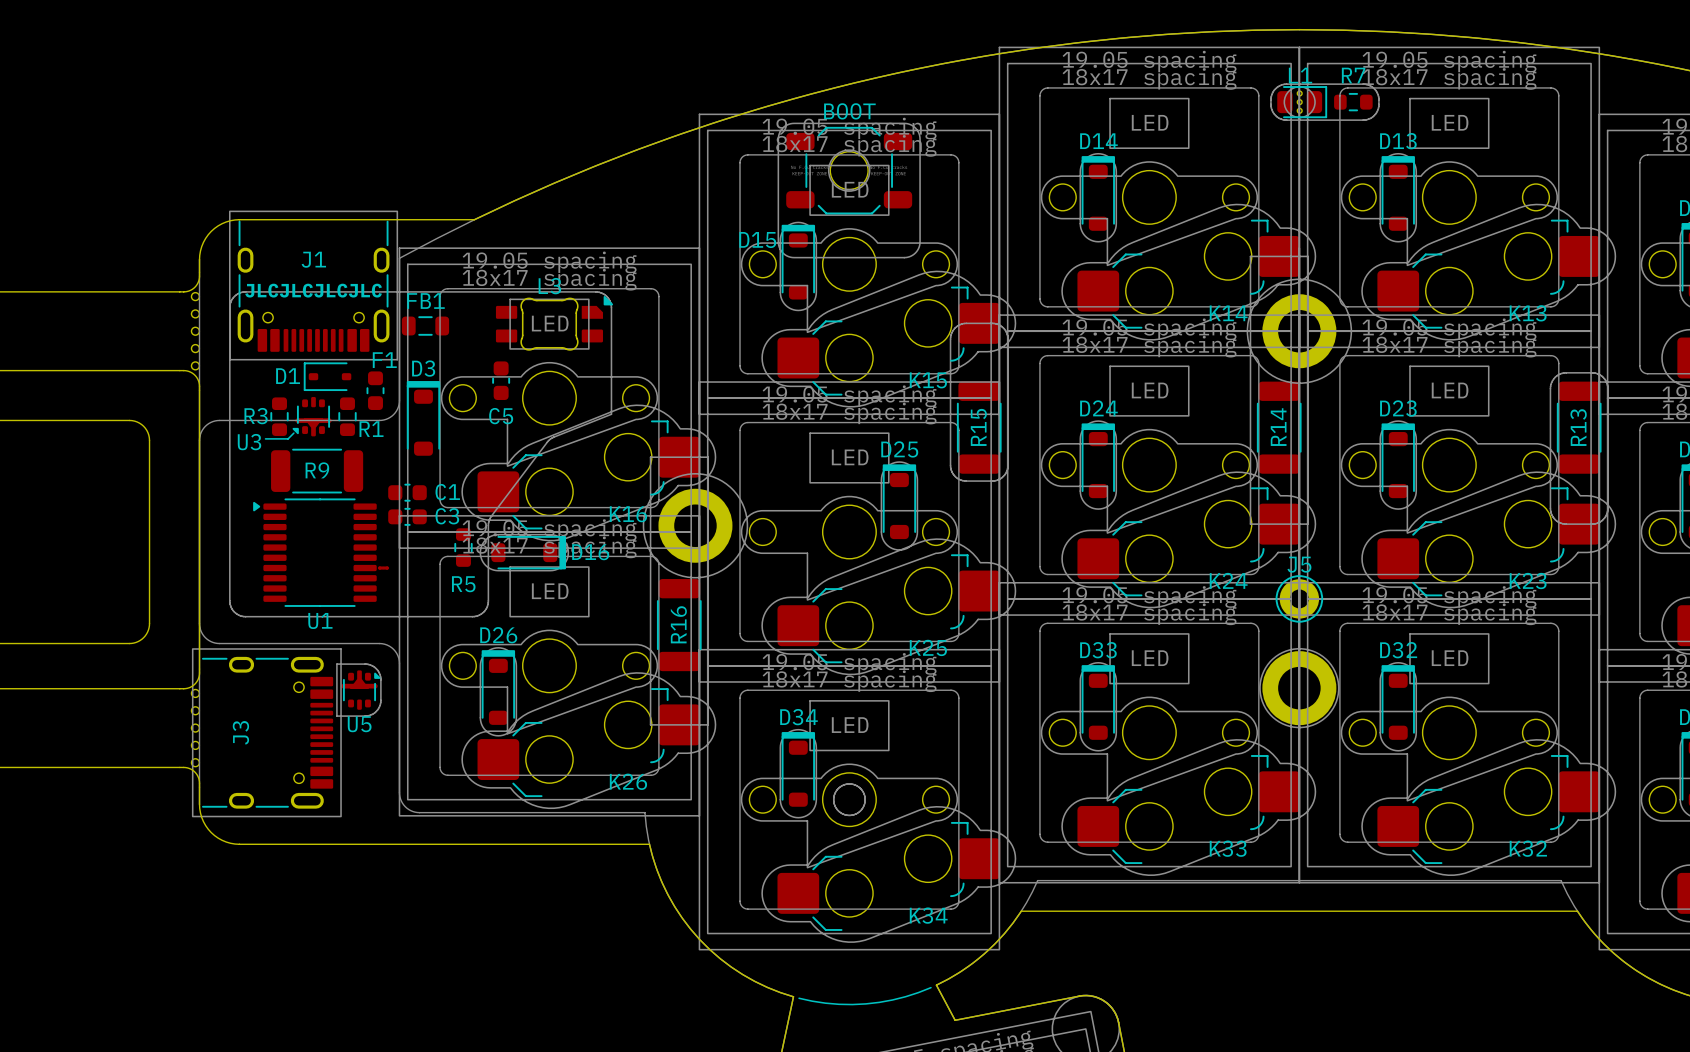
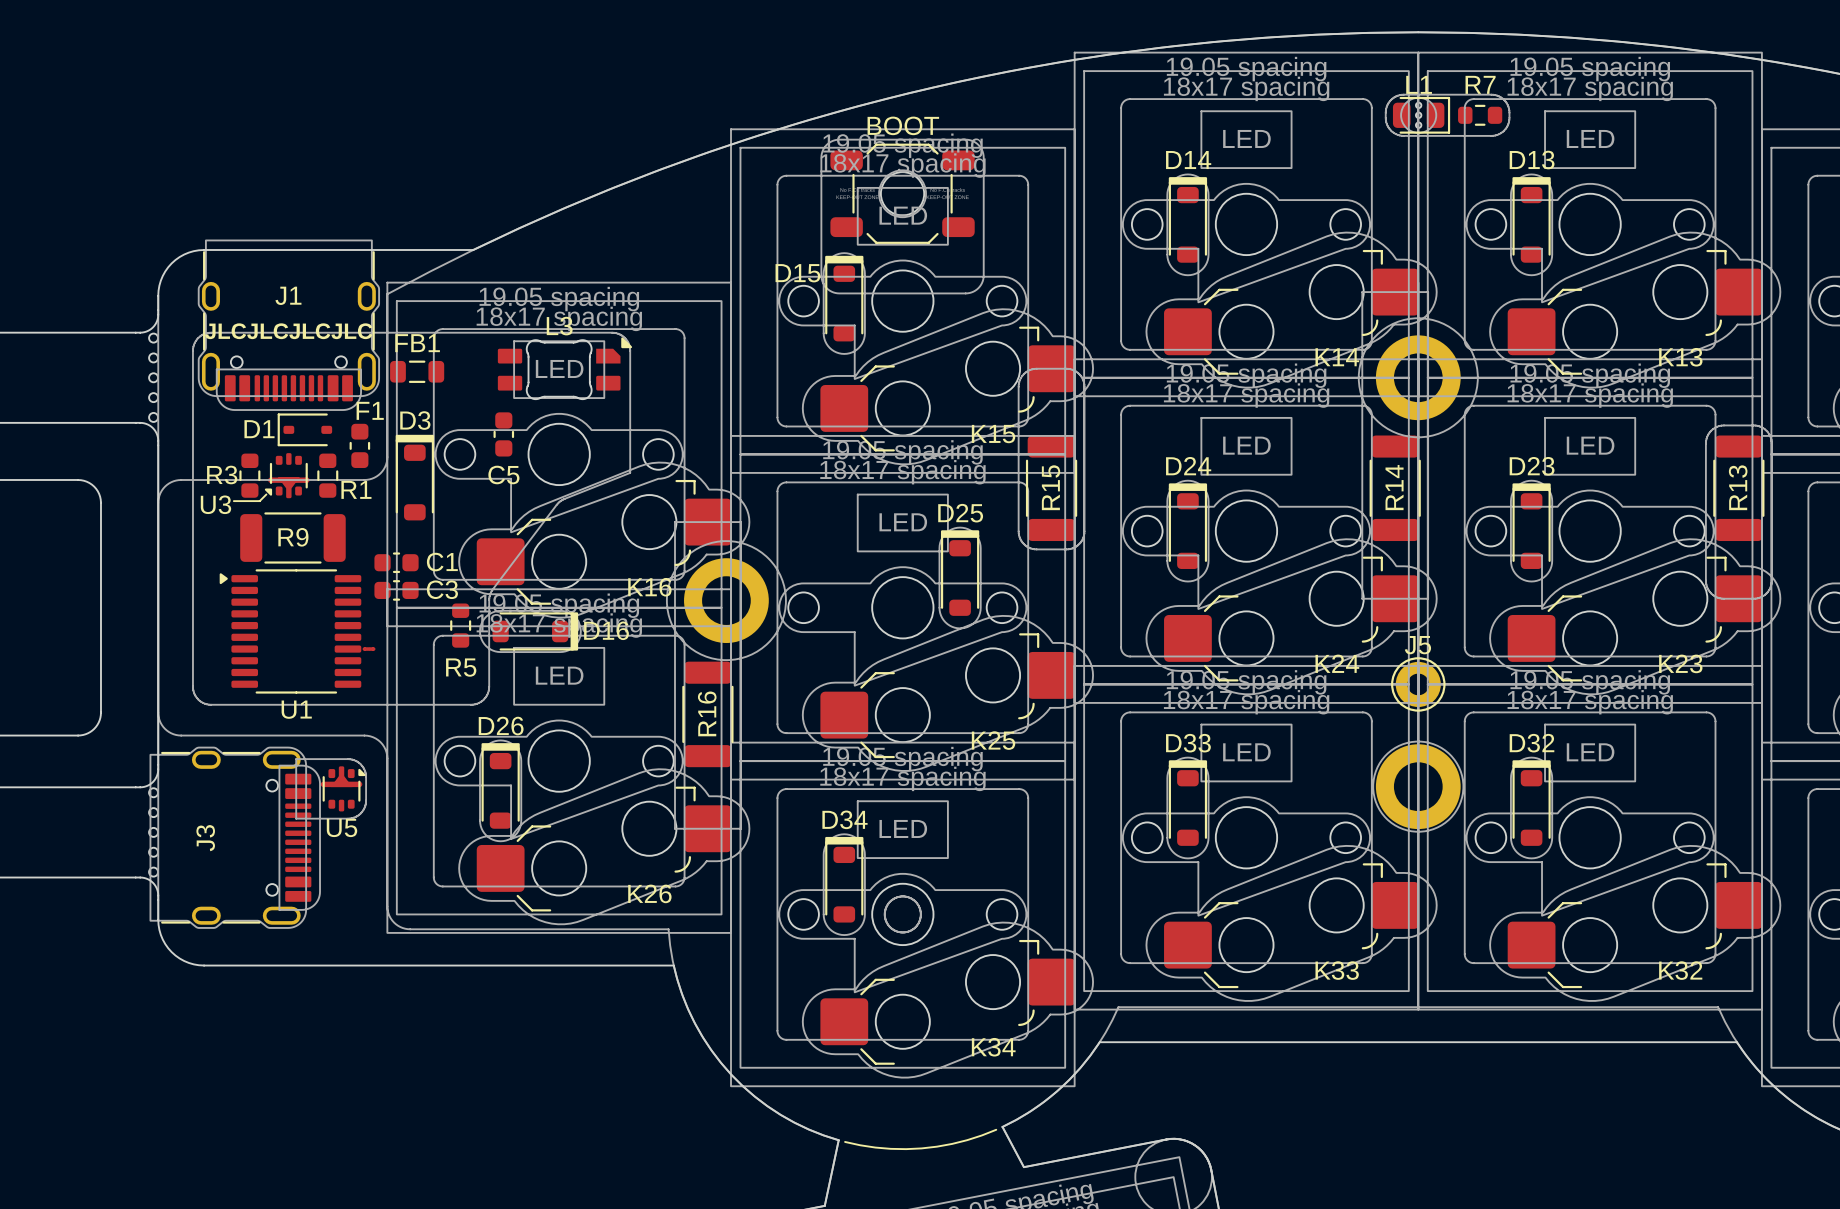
J1 footprint: [228, 210, 399, 361] -> [197, 239, 381, 411]
J3 footprint: [191, 648, 342, 818] -> [149, 746, 321, 929]
line: (336, 664) (336, 716) -> (315, 759) (296, 759) (296, 818) (315, 818)

